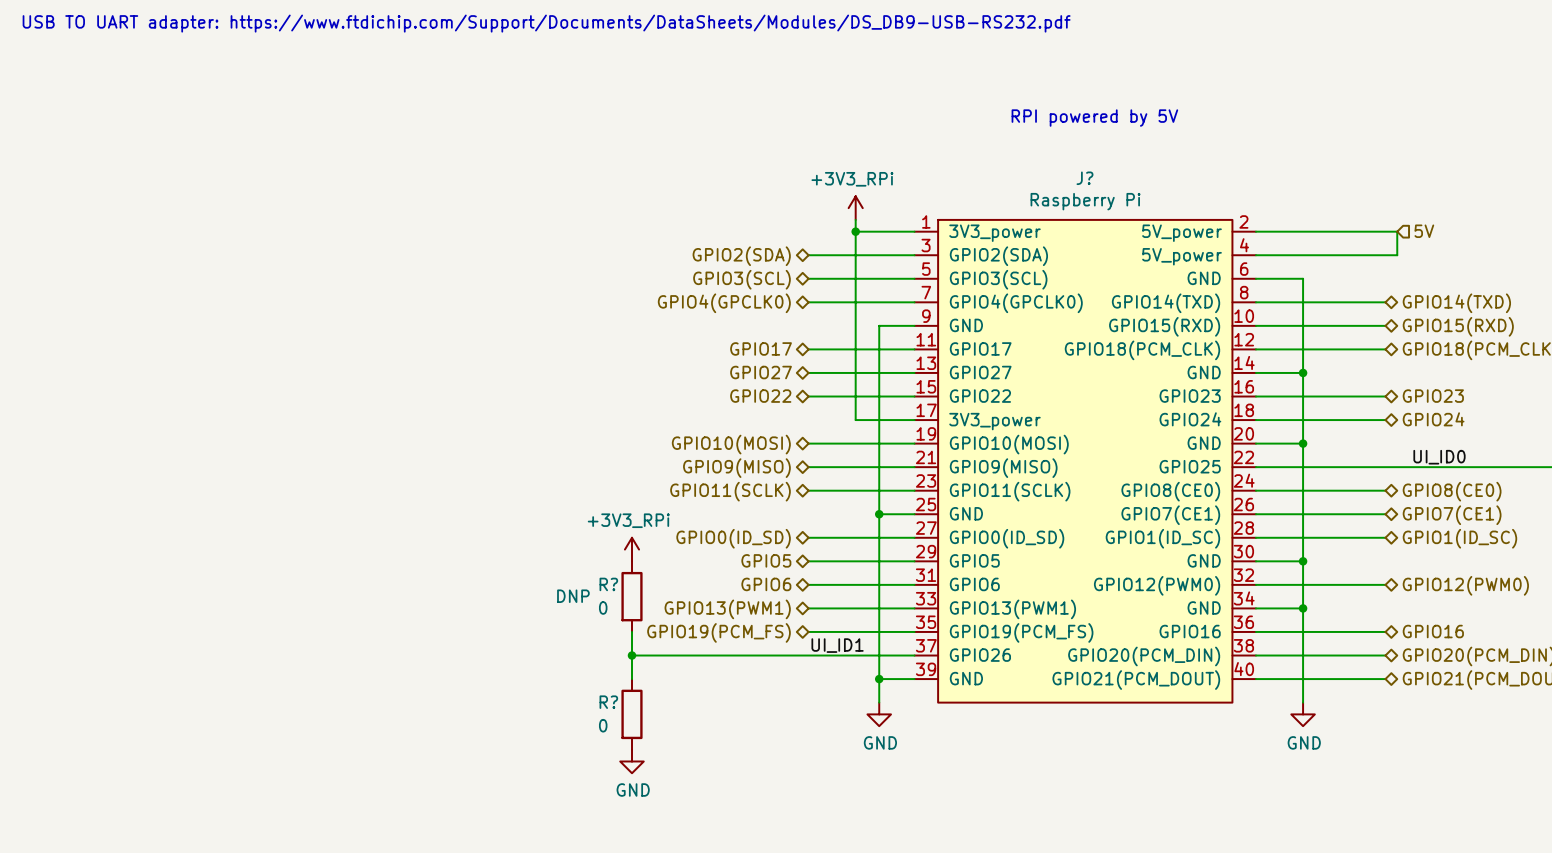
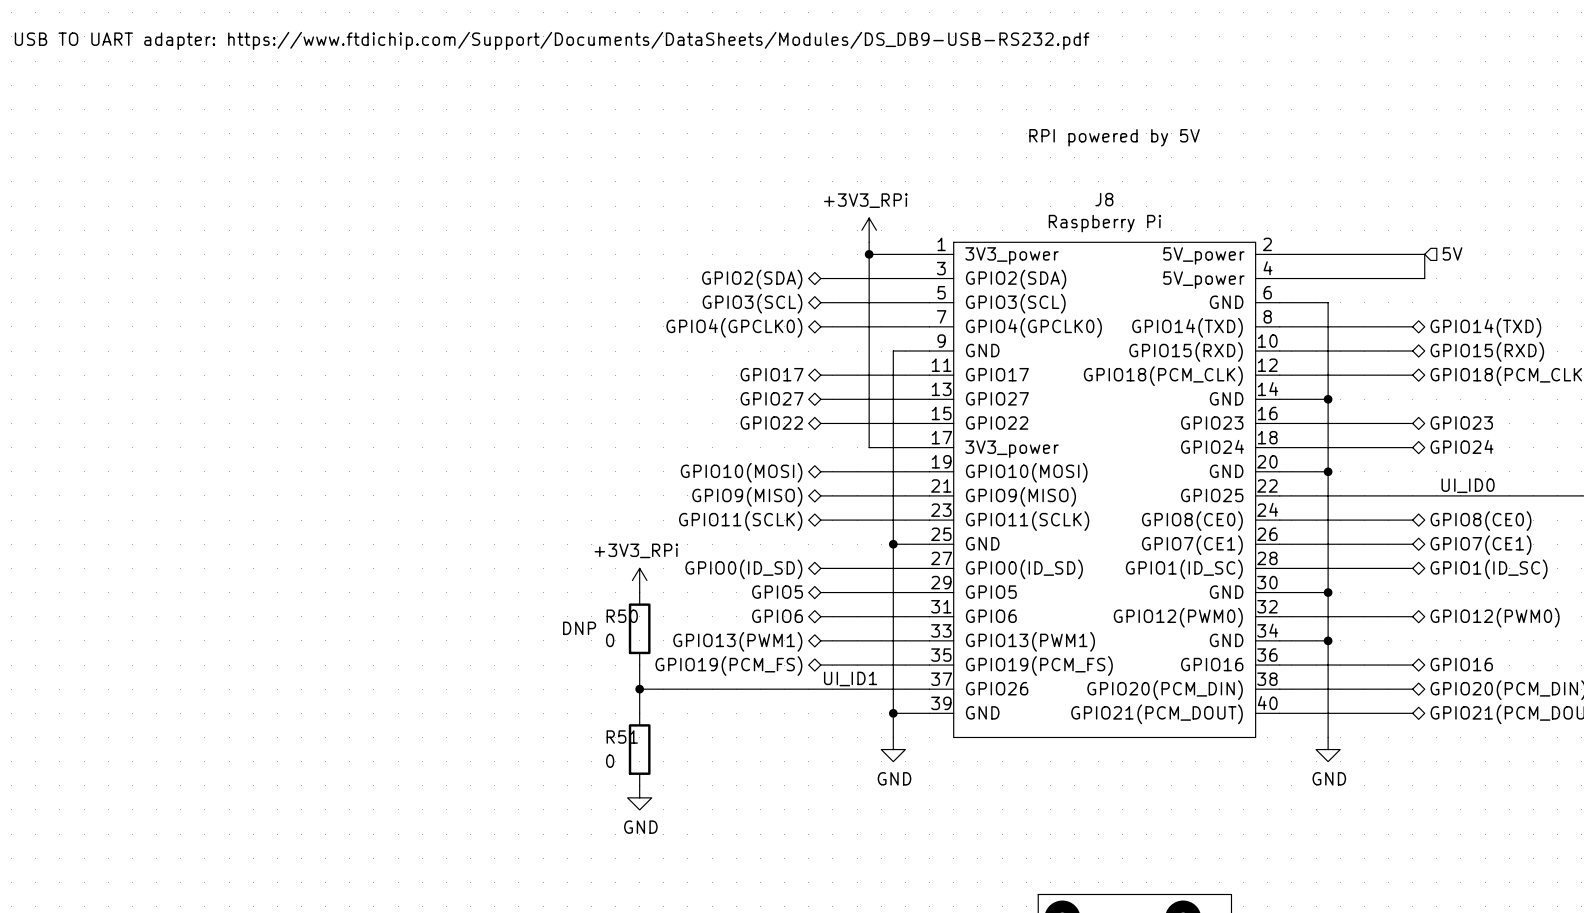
J? name: J? (1084, 178) -> J8 (1104, 199)
R? name: R? (608, 584) -> R50 (622, 616)
R? name: R? (608, 702) -> R51 (622, 737)

